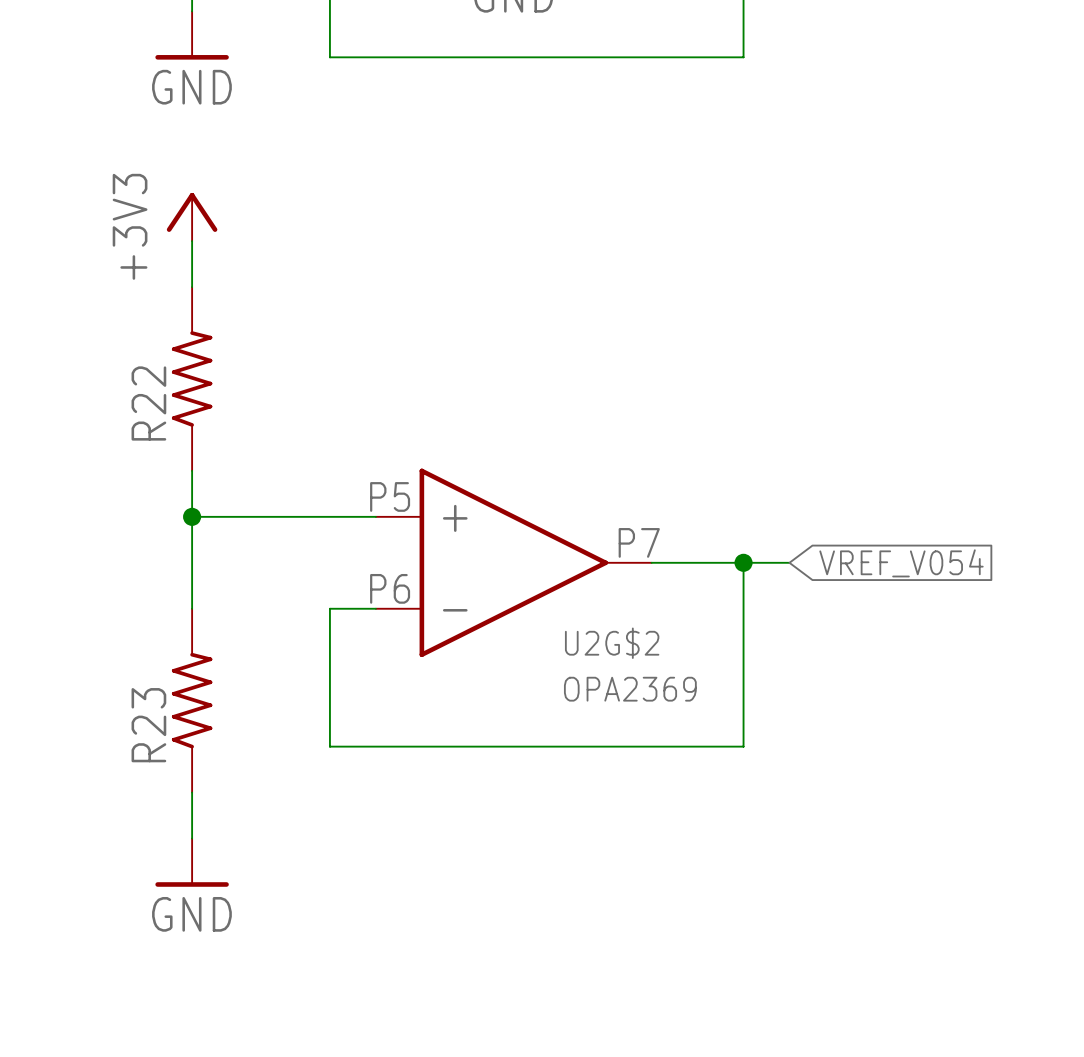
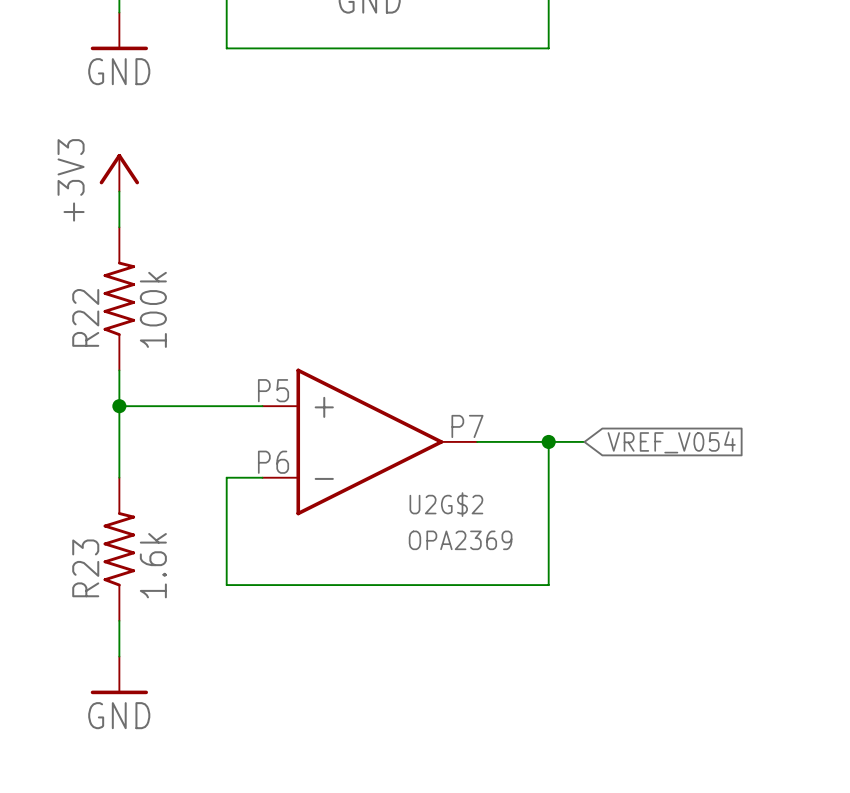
R22 value: none -> 100k (153, 309)
R23 value: none -> 1.6k (153, 565)

